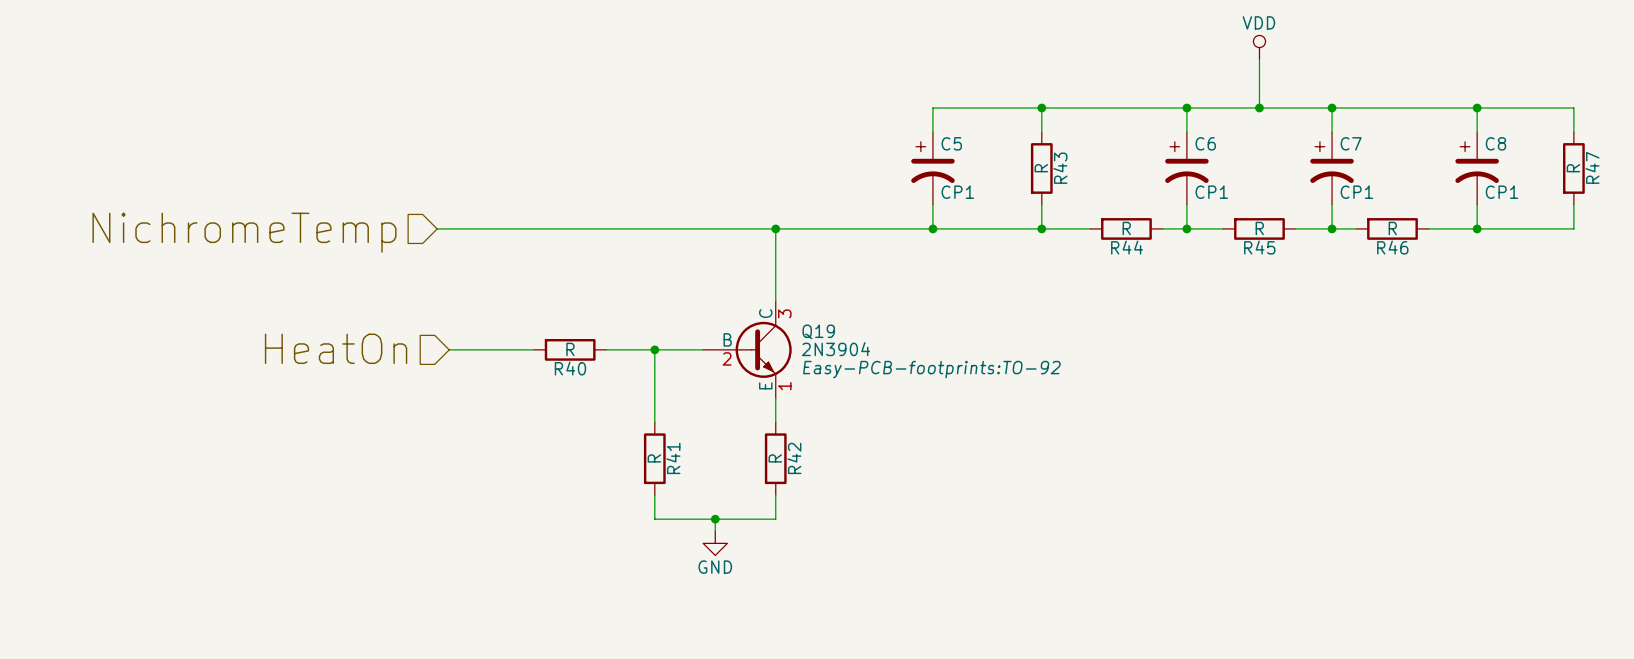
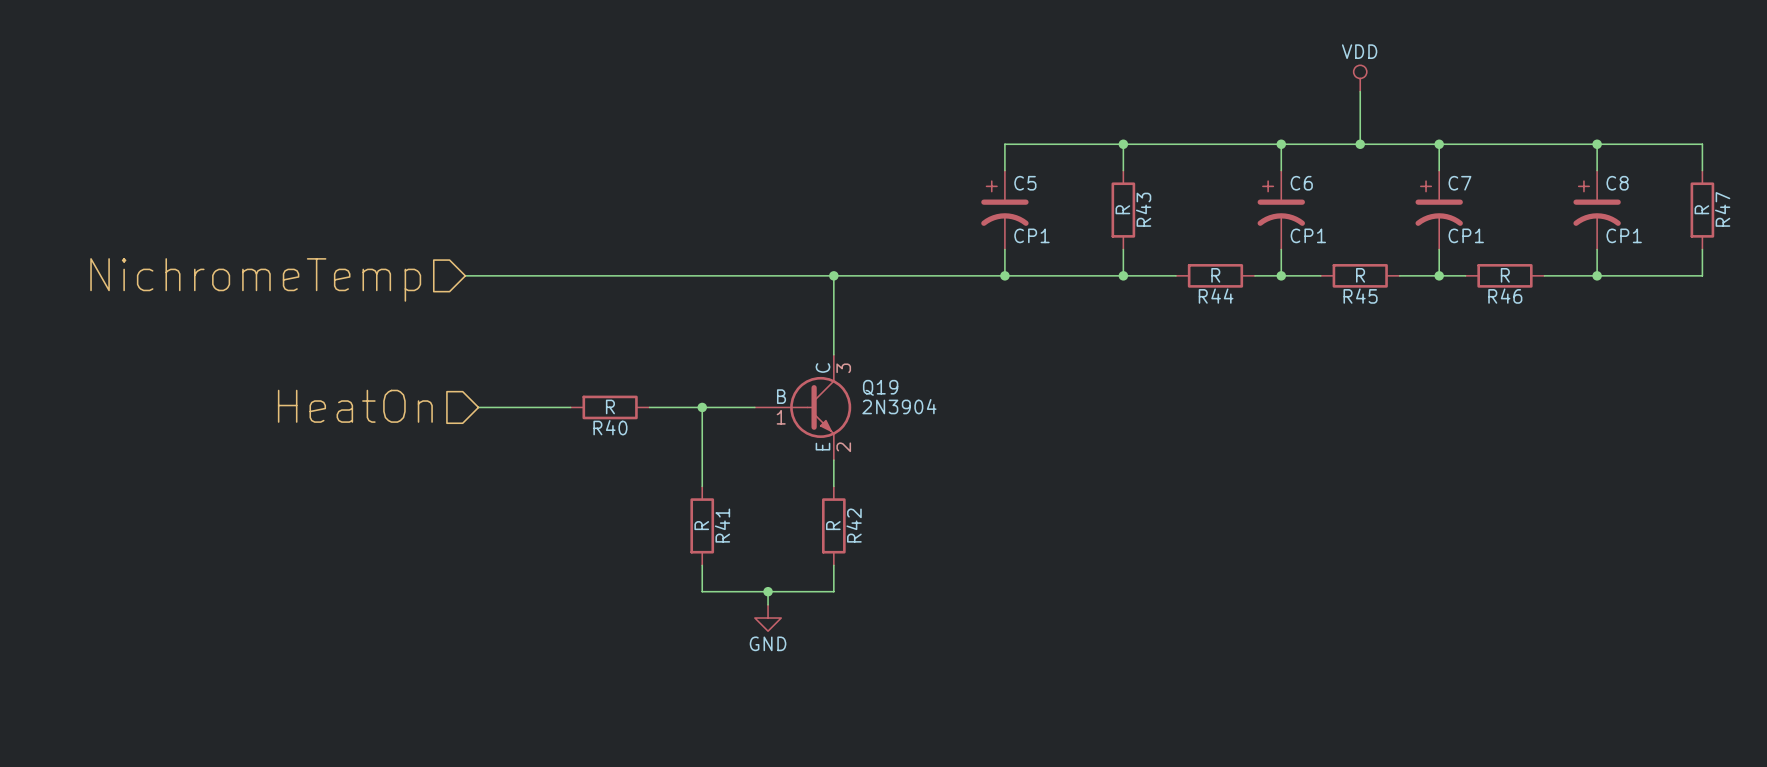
Q19 pin number: 2 (727, 358) -> 1 (781, 417)
Q19 text: Easy-PCB-footprints:TO-92 (931, 369) -> none
Q19 pin number: 1 (784, 386) -> 2 (843, 447)

